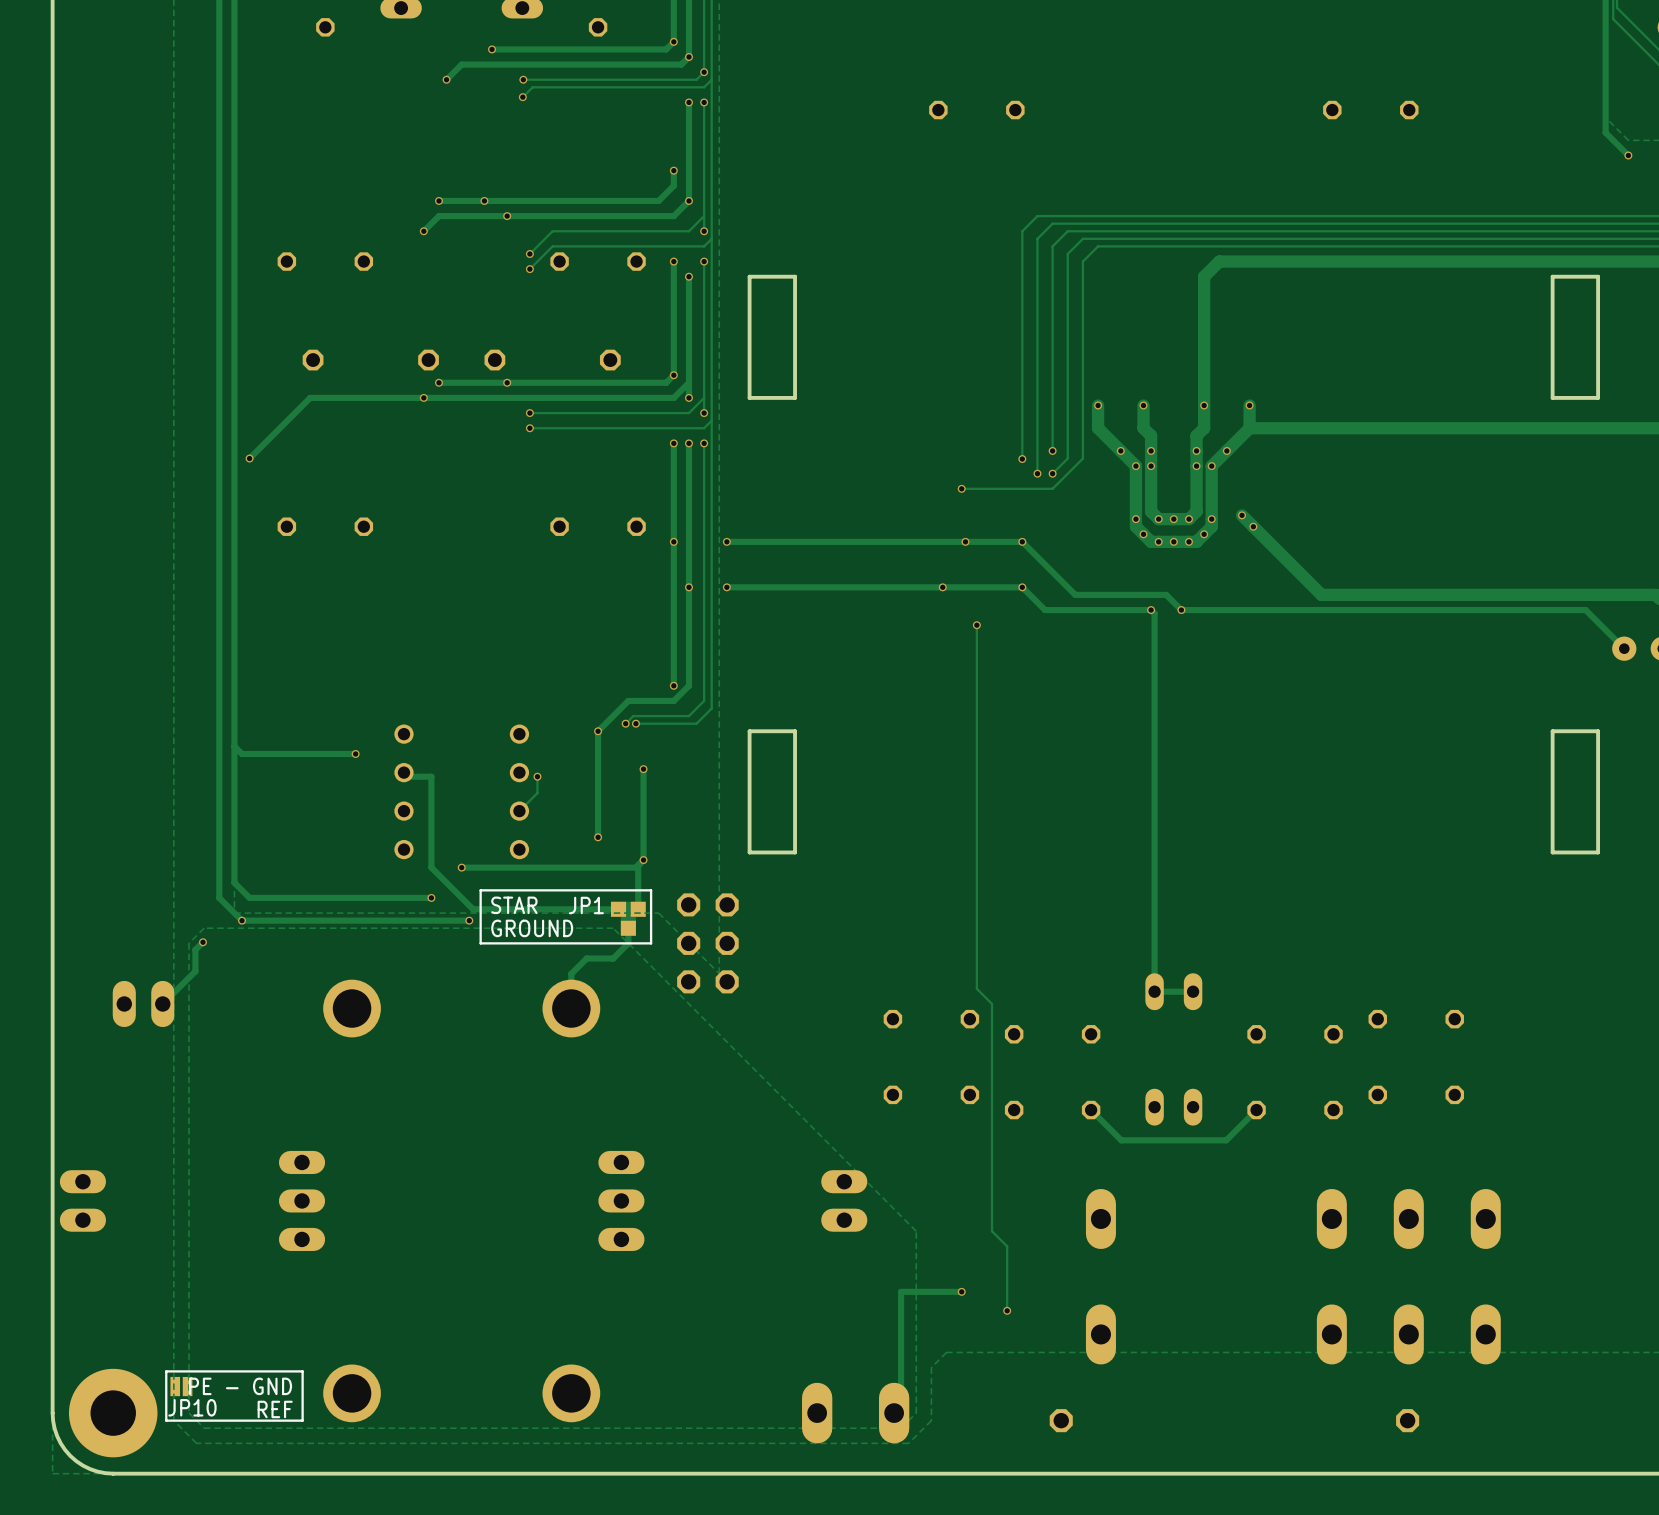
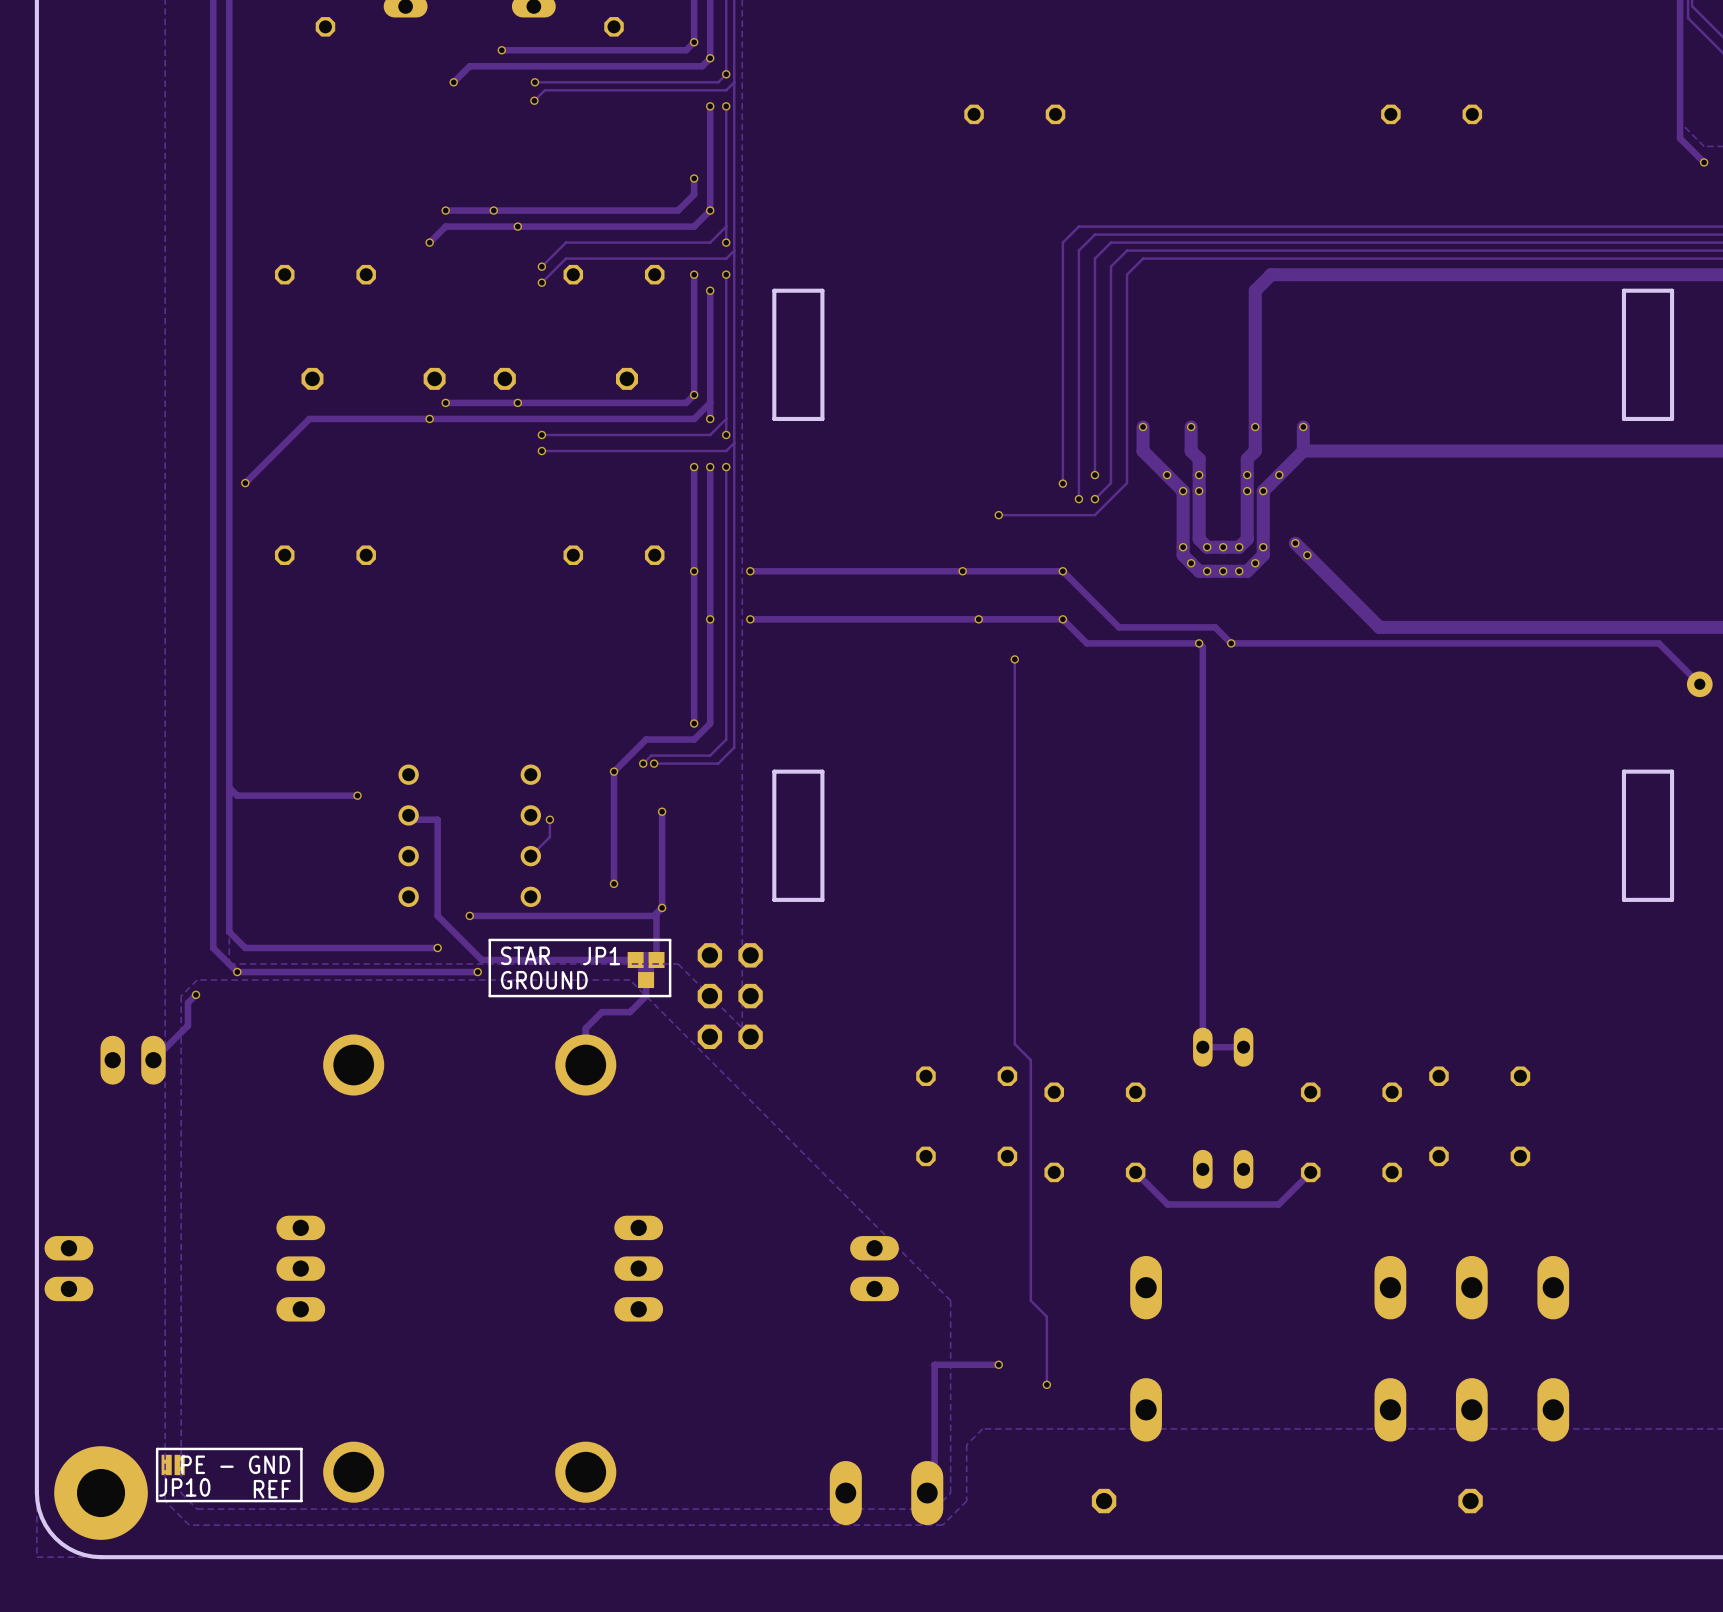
via position: (965, 541) -> (962, 571)

